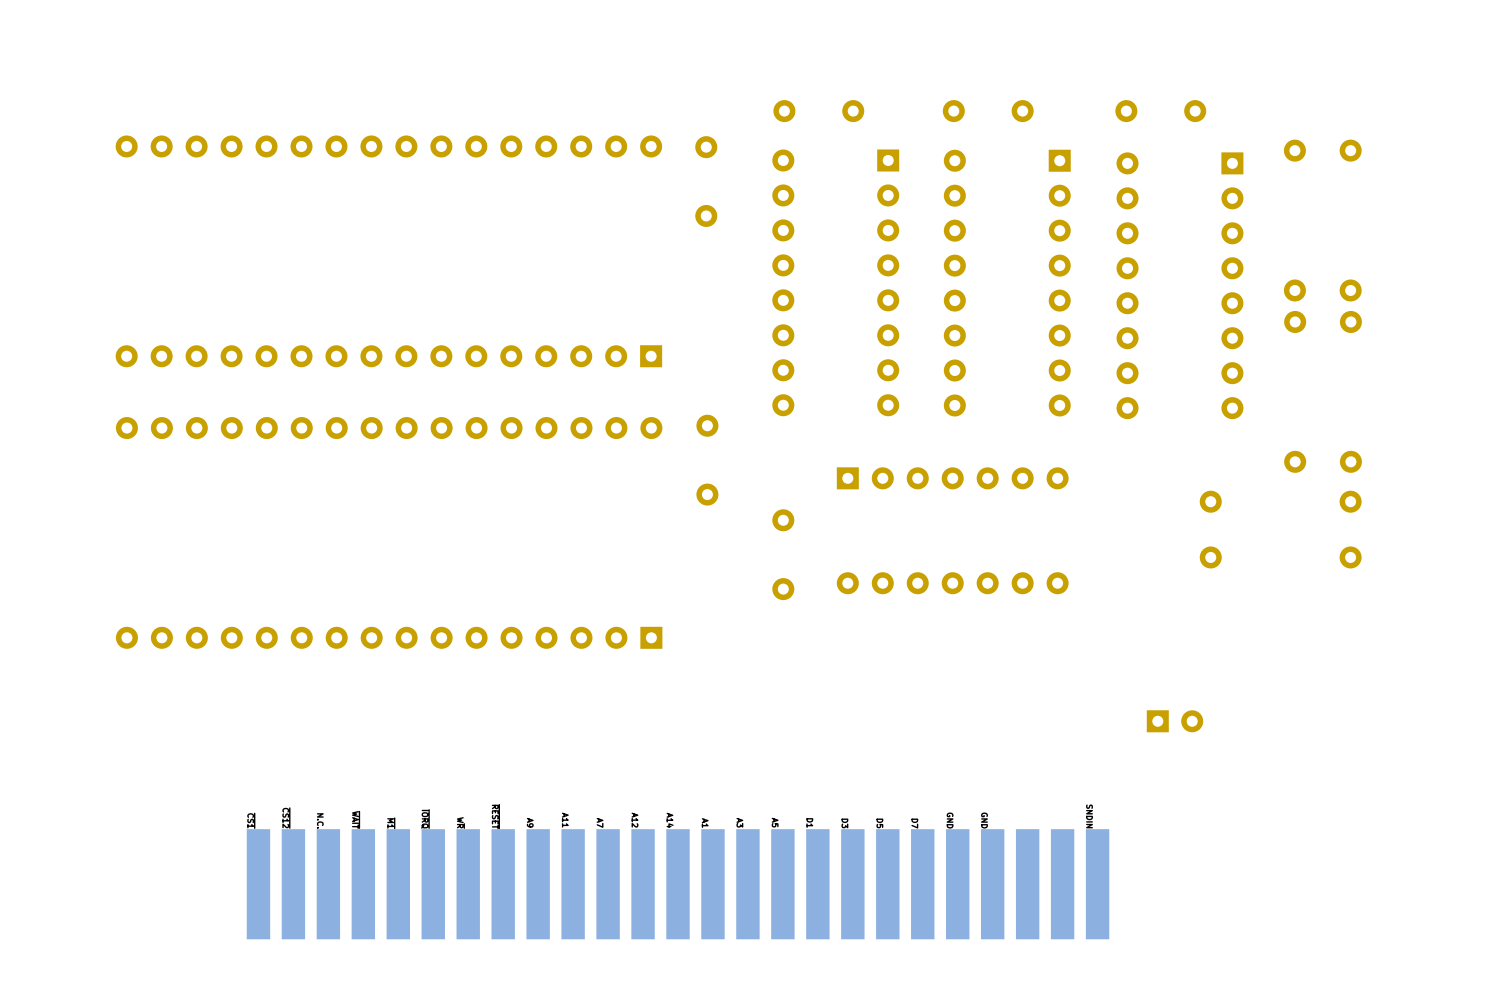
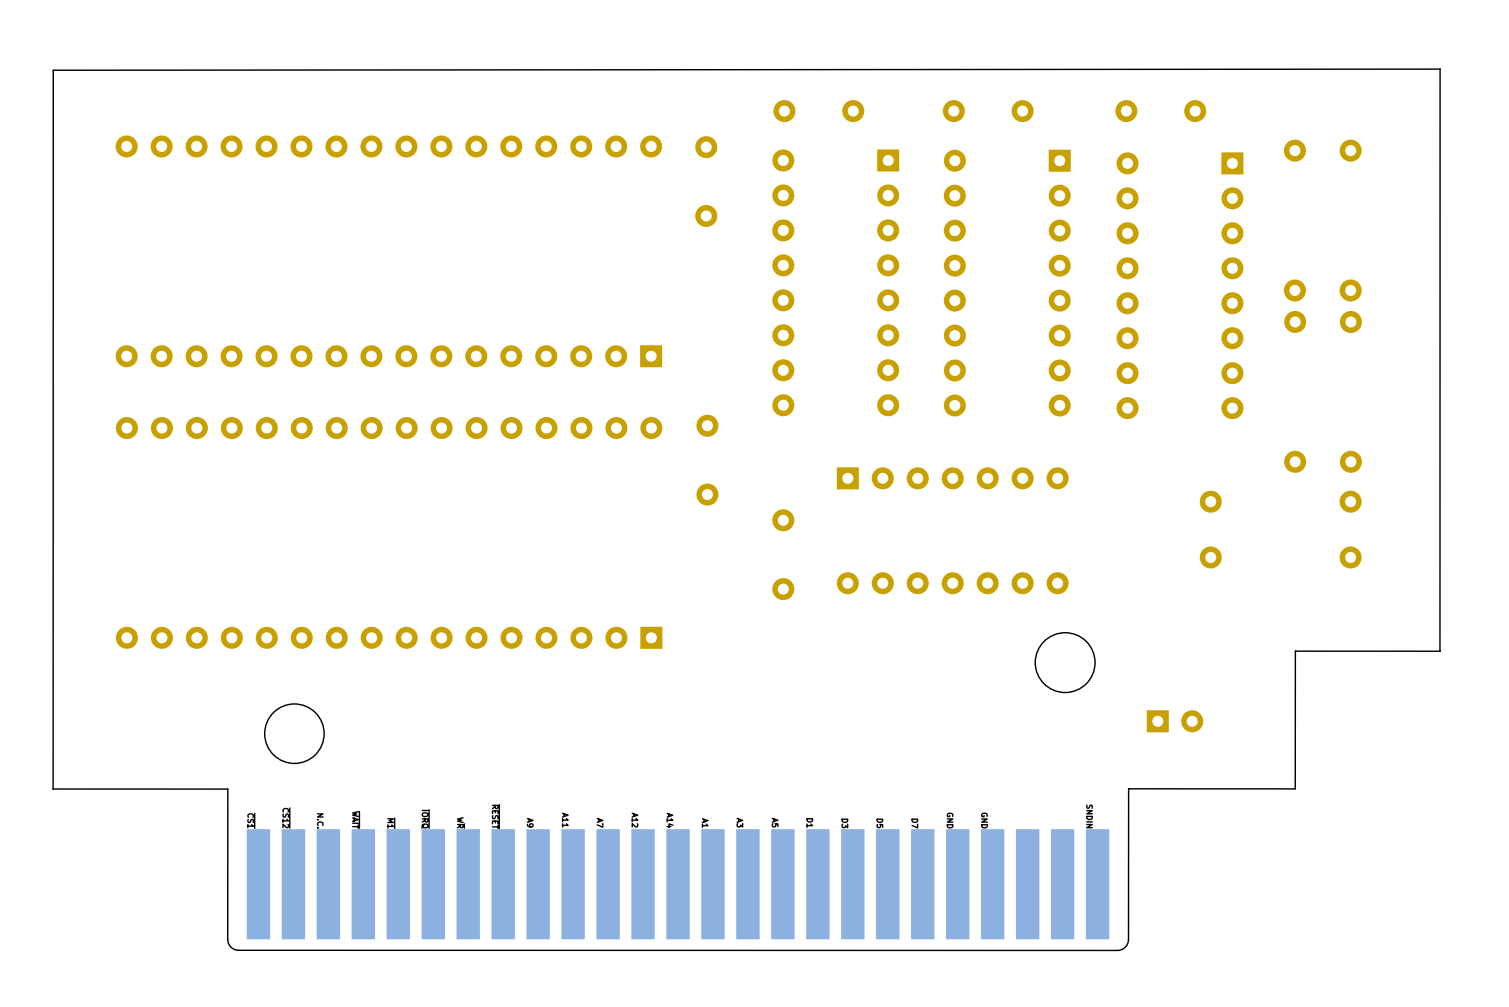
board edge: none -> (1440, 69) (1439, 651) (1295, 651) (1295, 788) (1128, 788) (1128, 939) (1122, 948) (236, 950) (229, 945) (227, 939) (227, 789) (53, 789) (53, 70) (1440, 69)
round board edge: none -> [1034, 632, 1096, 694]
round board edge: none -> [263, 703, 325, 765]

